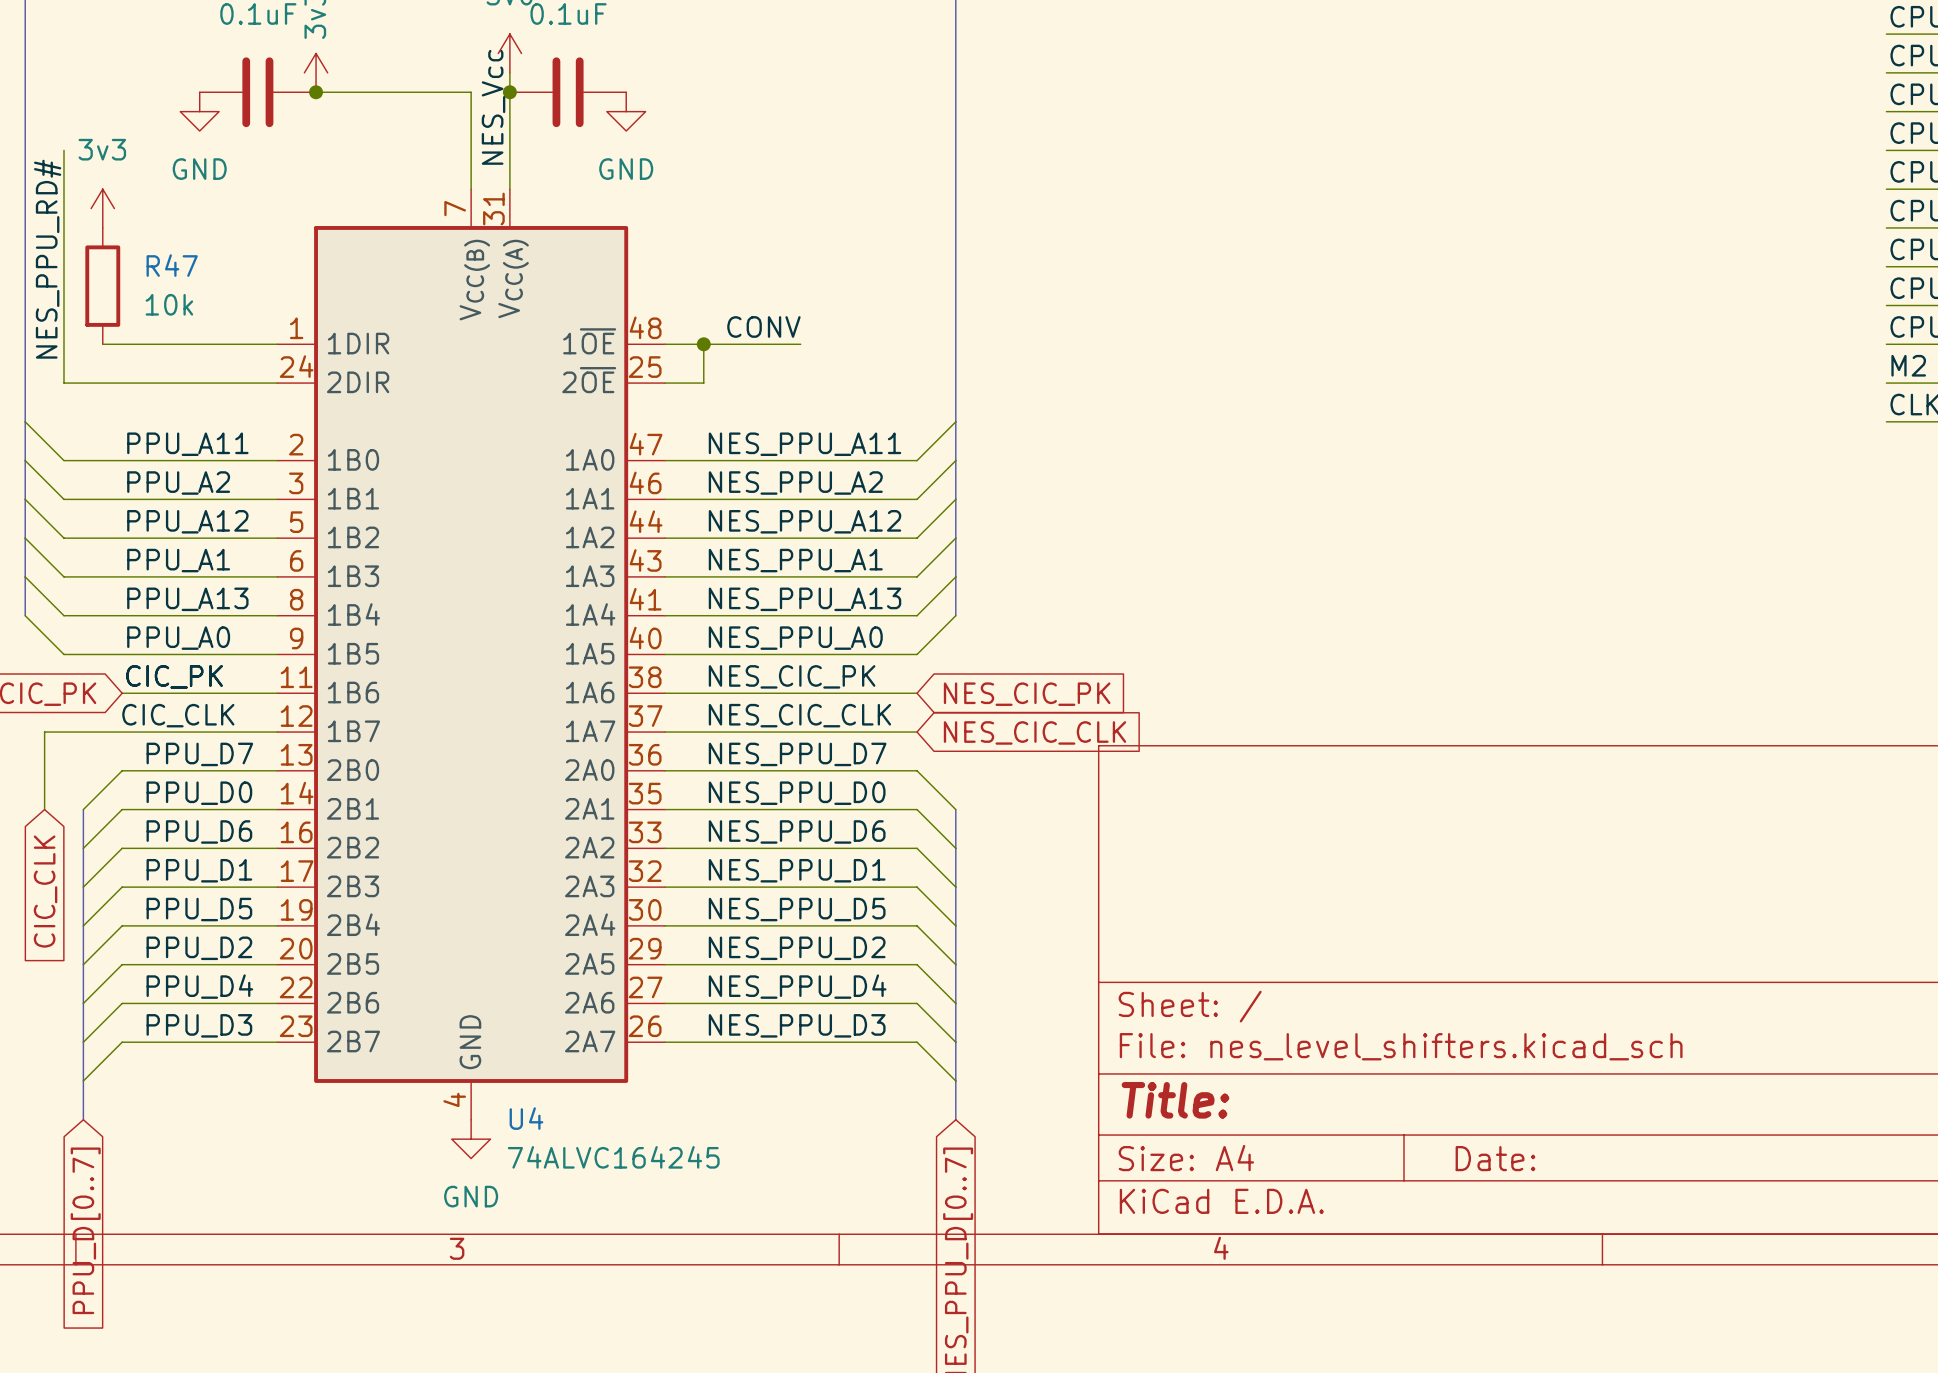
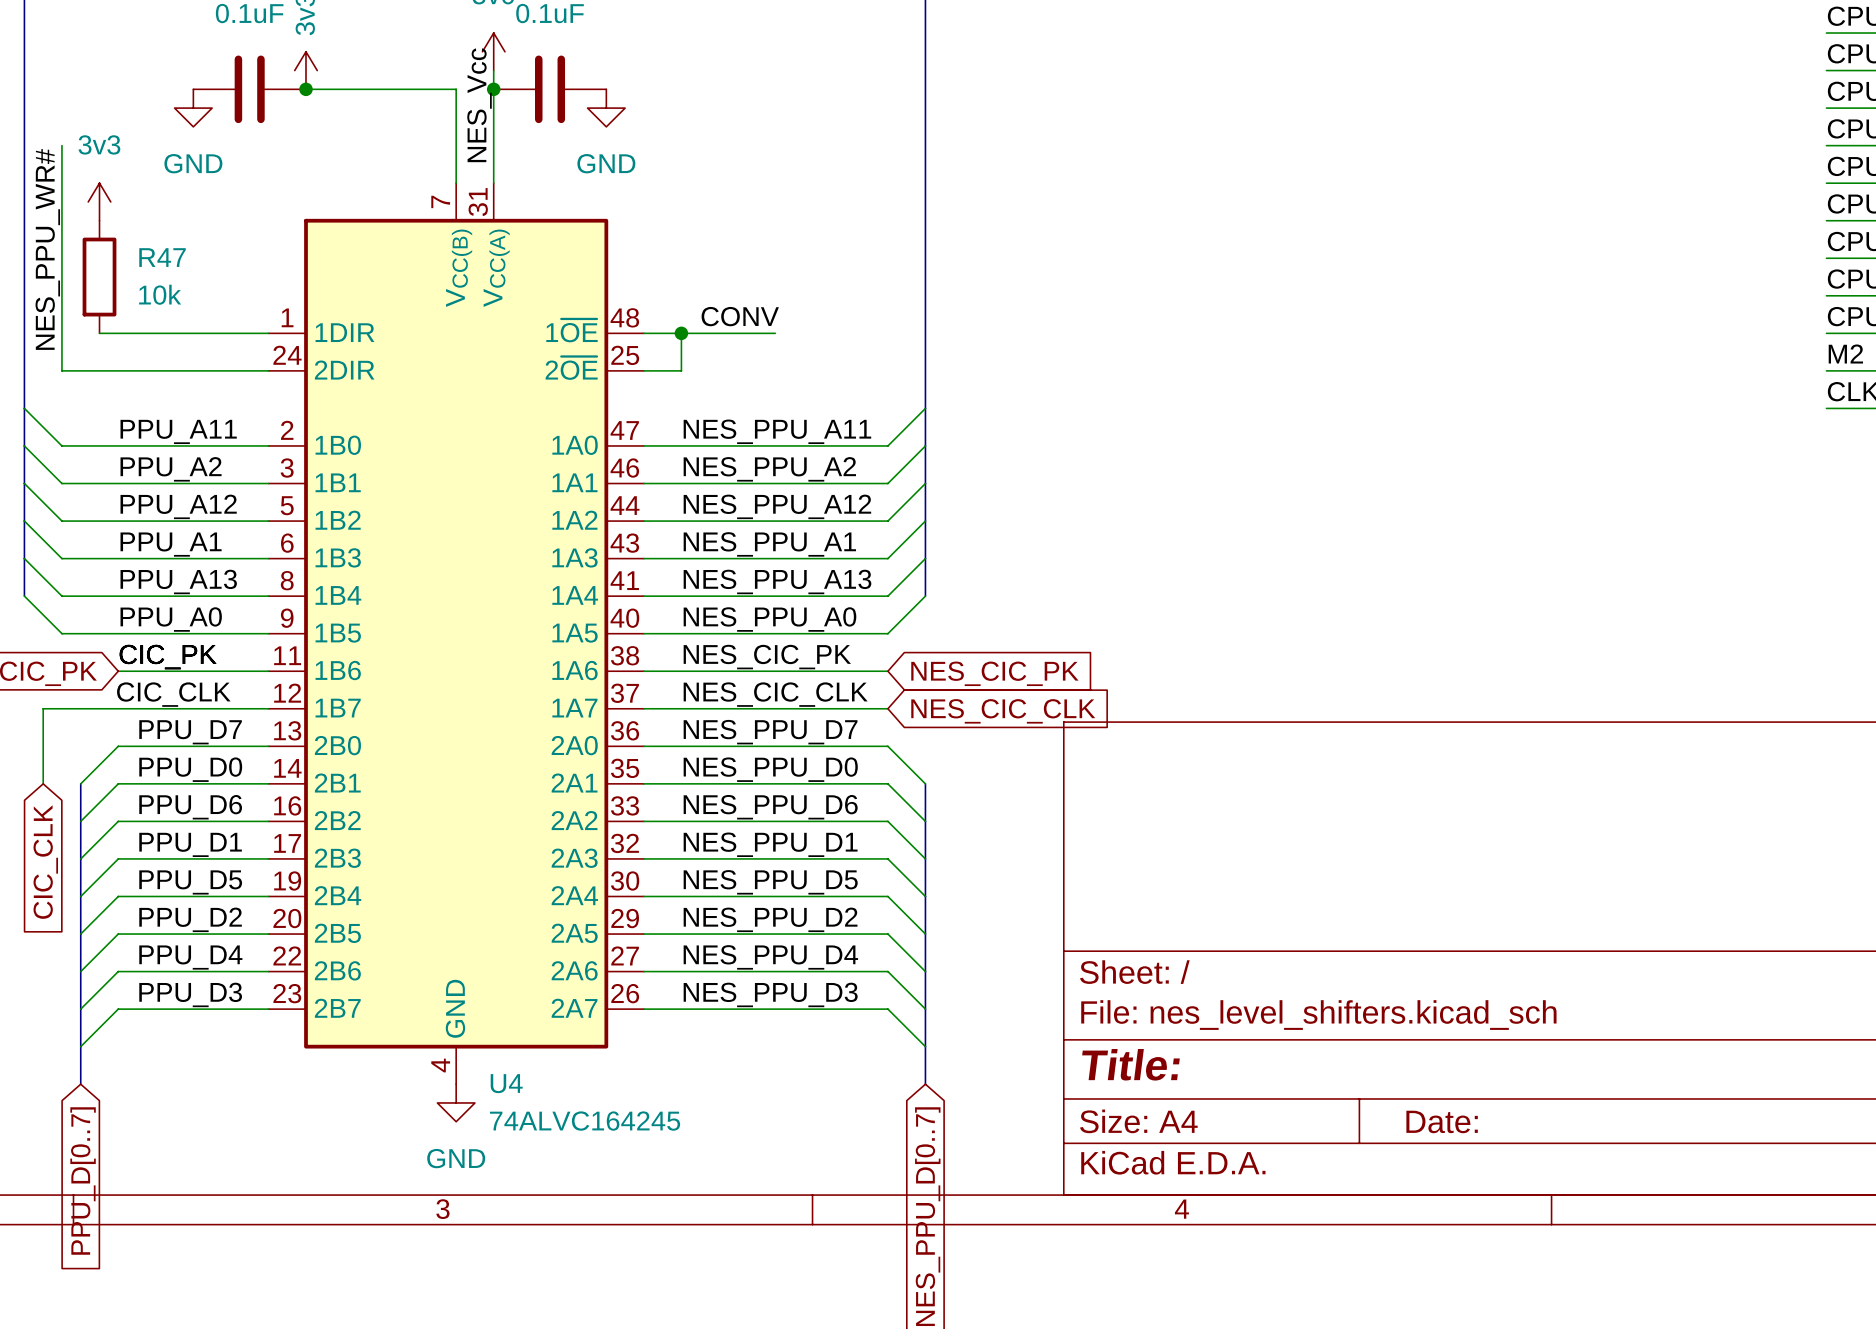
label: NES_PPU_RD# (47, 259) -> NES_PPU_WR# (47, 249)

